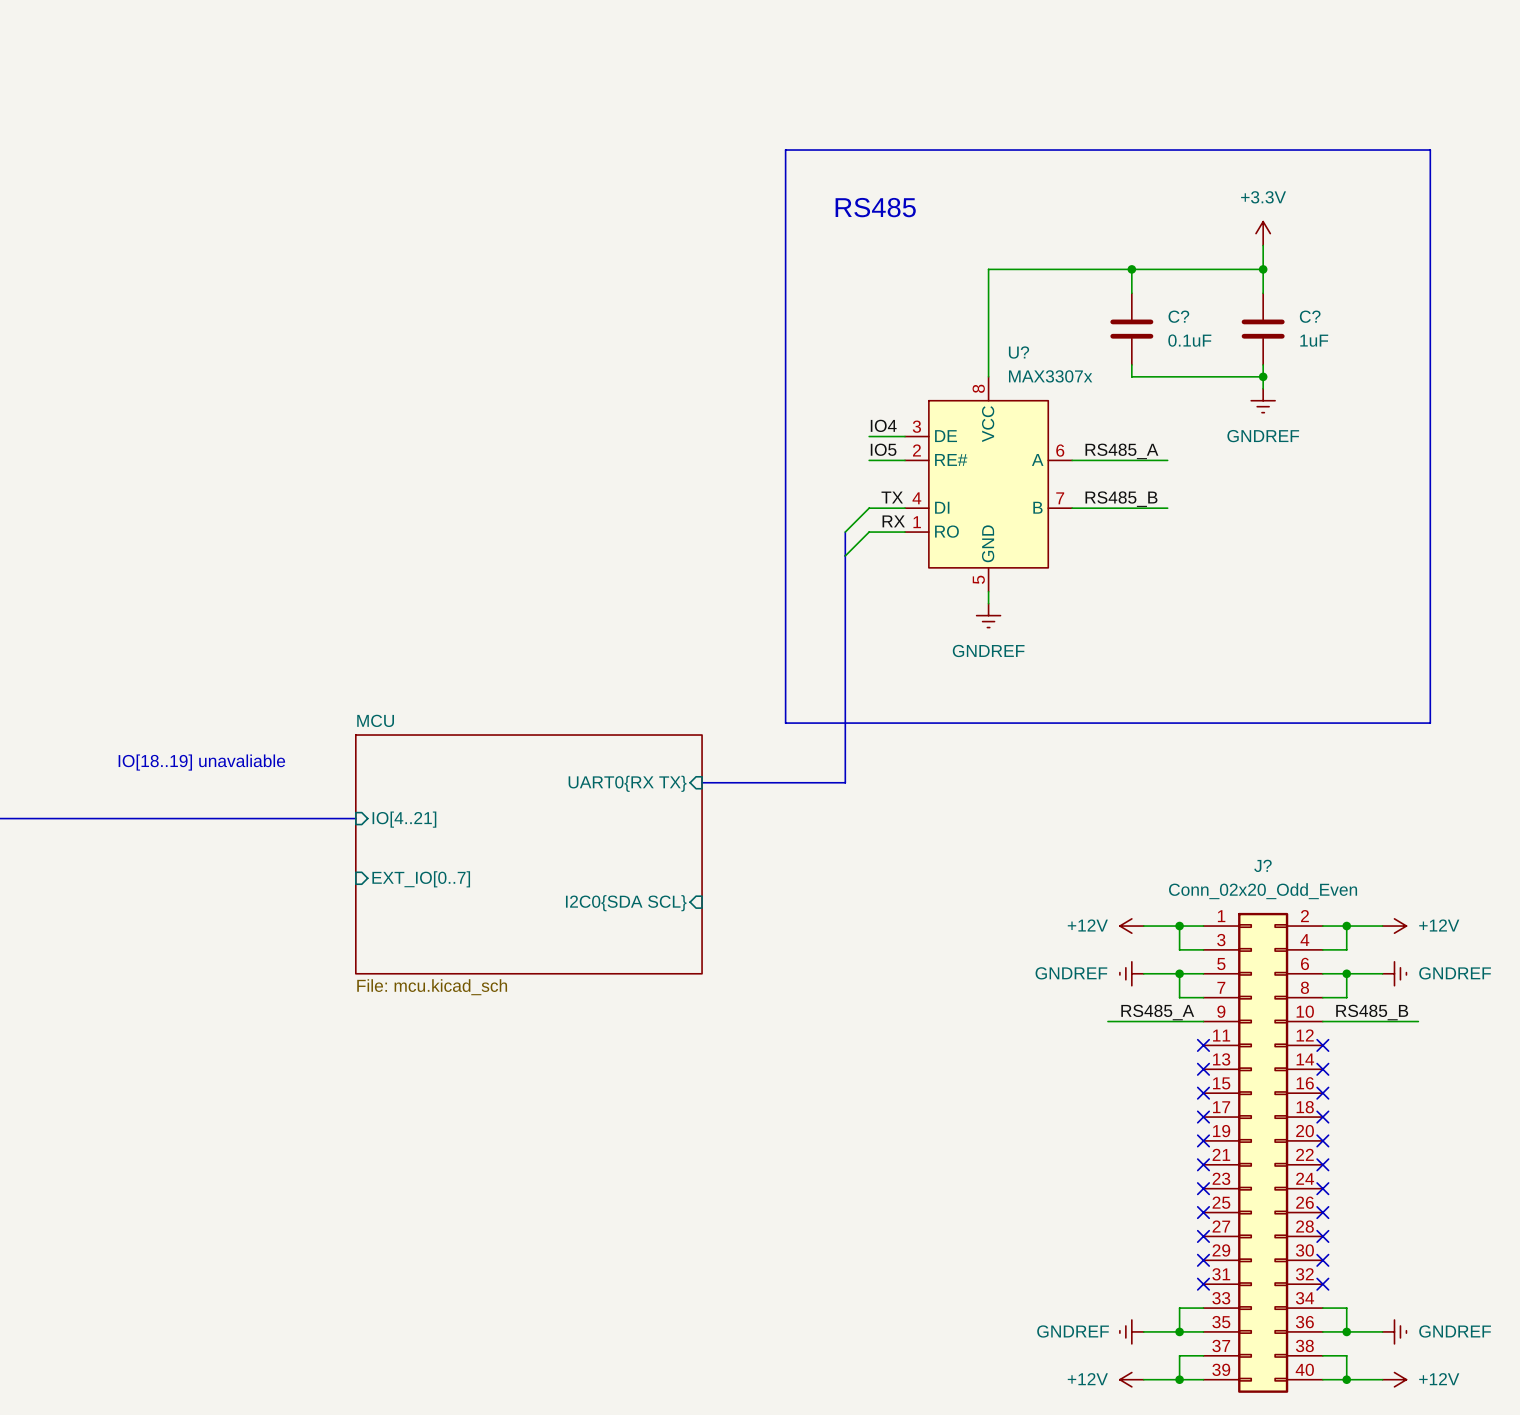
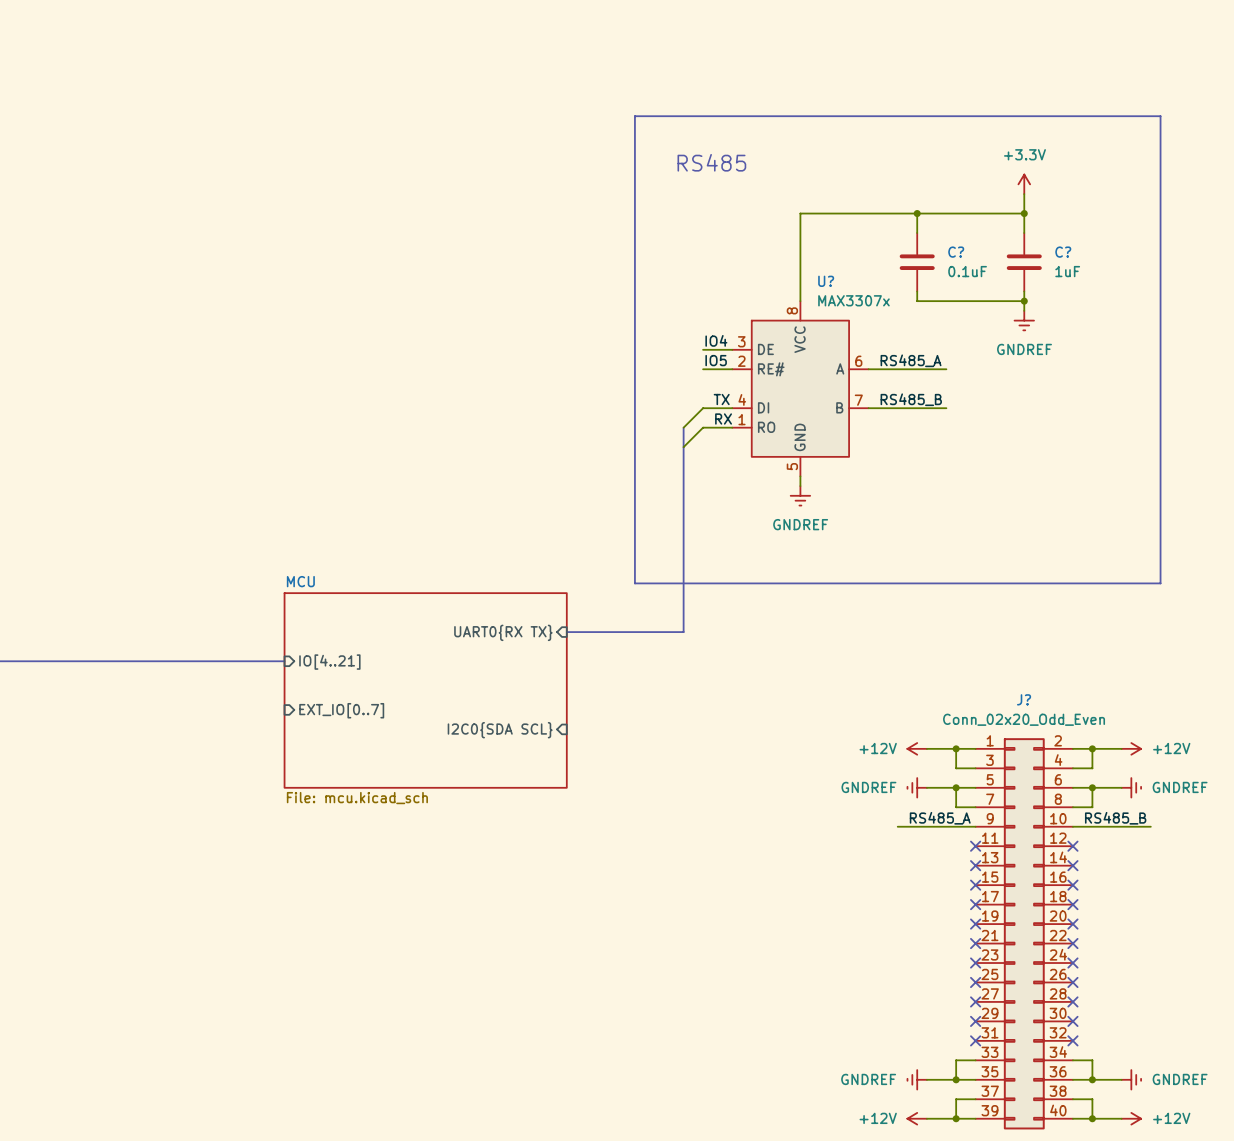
text: IO[18..19] unavaliable (201, 762) -> none

